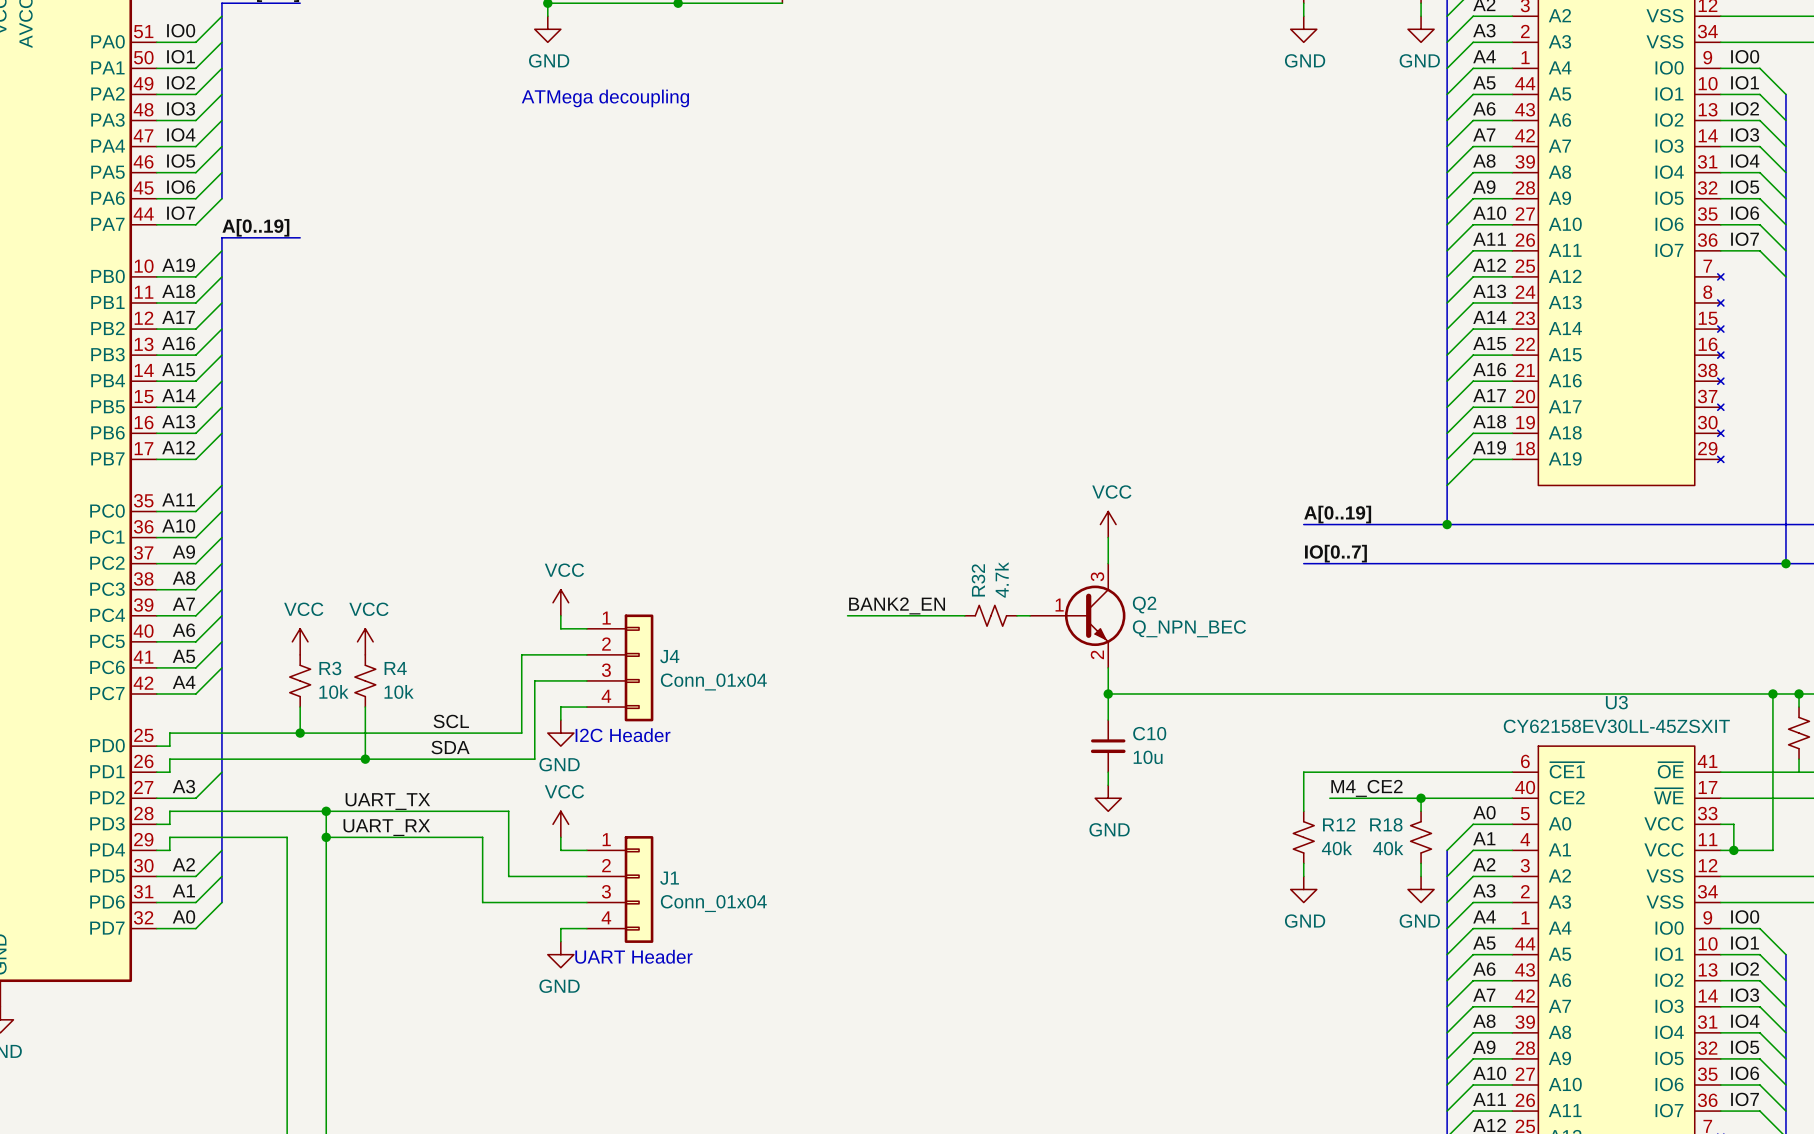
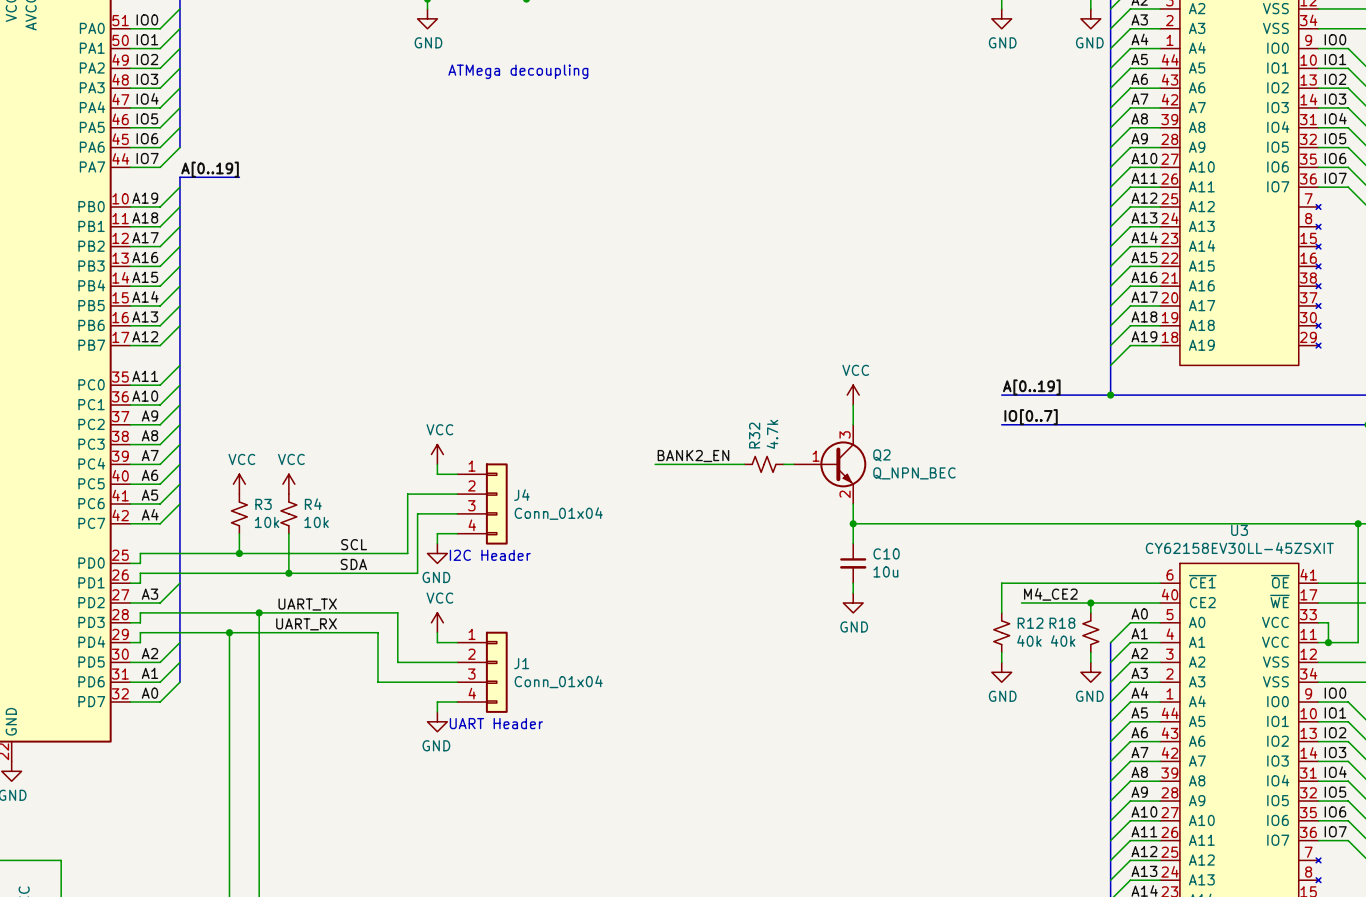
text position: ATMega decoupling (605, 98) -> ATMega decoupling (518, 71)
wire: none -> (229, 632) (259, 632)
junction position: (326, 837) -> (229, 632)

